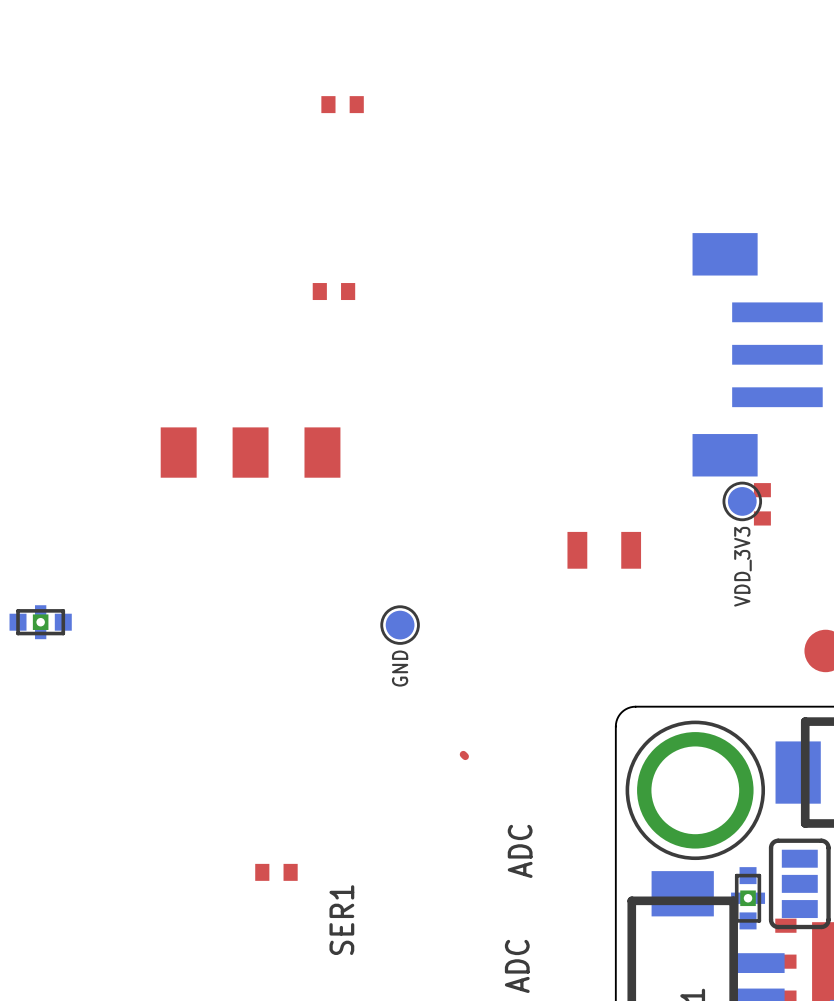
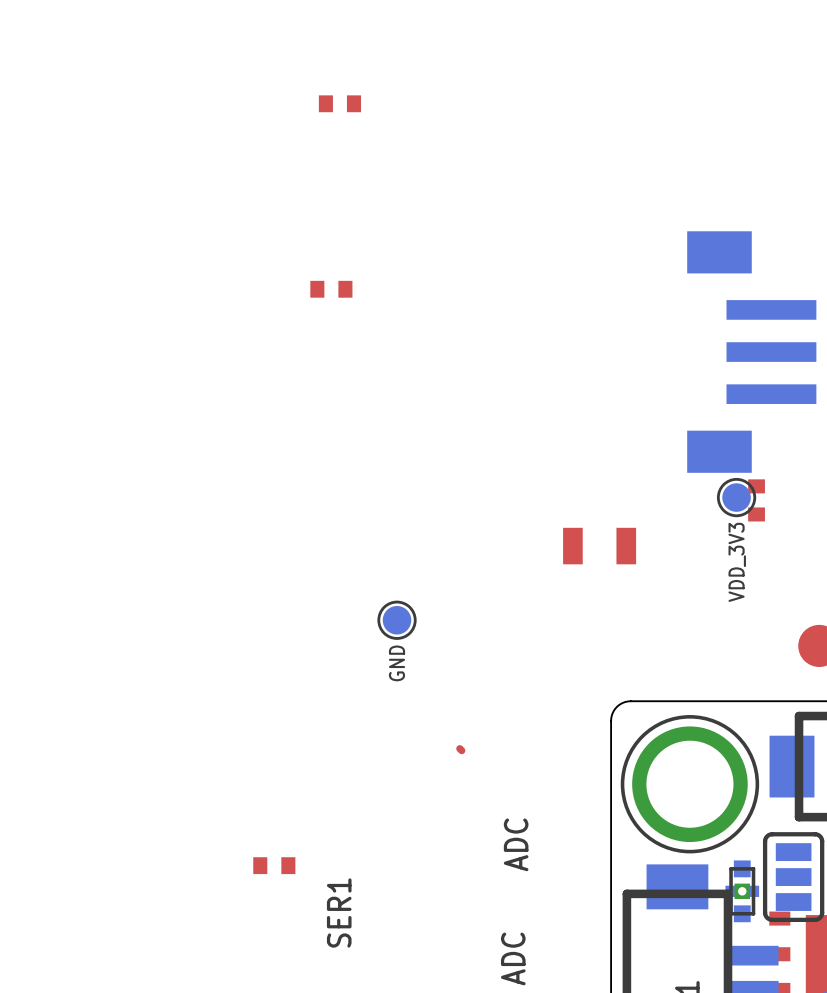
part: (250, 452) -> none
part: (40, 622) -> none

